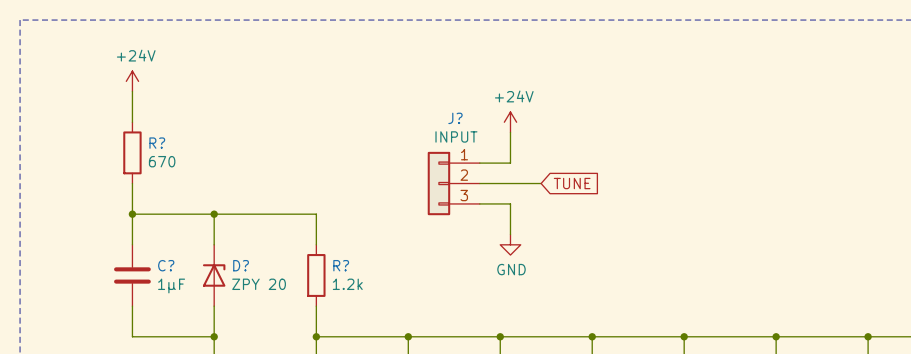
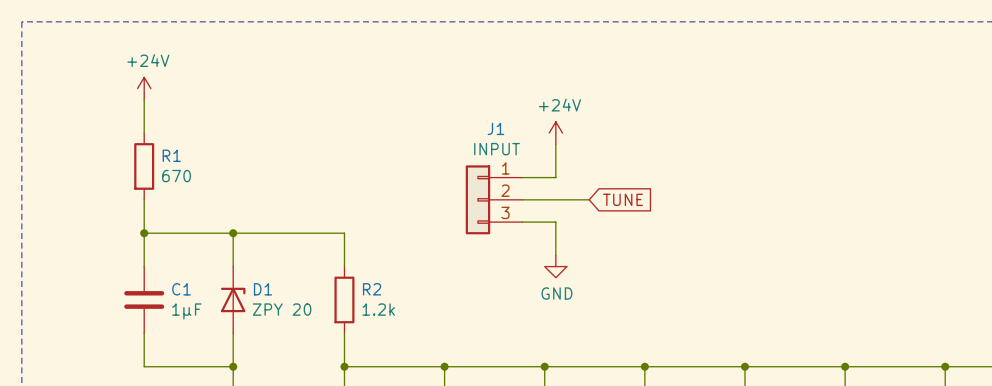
J? name: J? (455, 118) -> J1 (495, 128)
R? name: R? (157, 143) -> R1 (171, 155)
C? name: C? (166, 265) -> C1 (181, 289)
D? name: D? (241, 265) -> D1 (263, 289)
R? name: R? (341, 265) -> R2 (372, 289)

